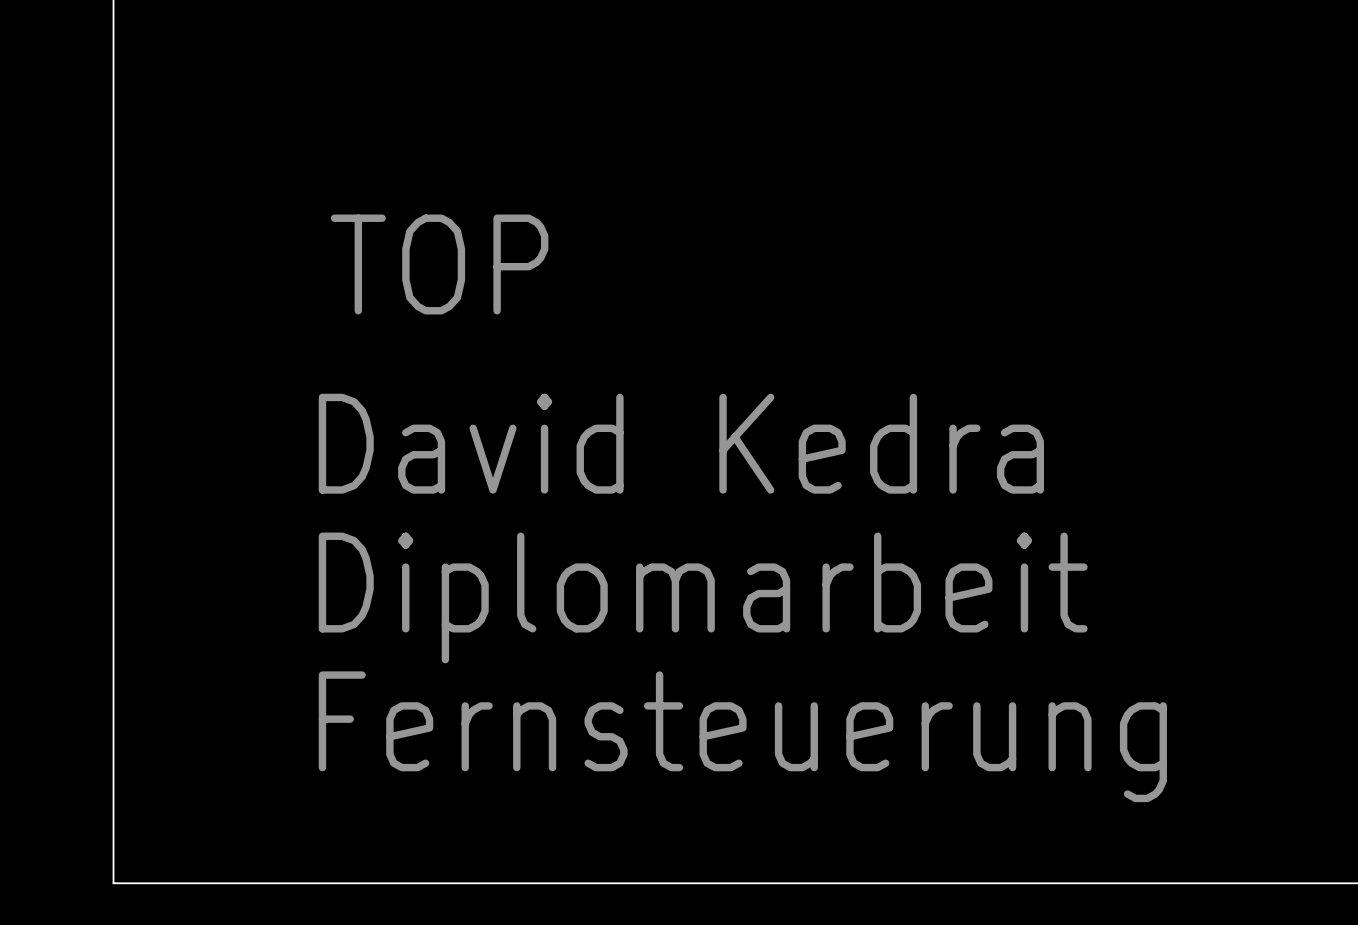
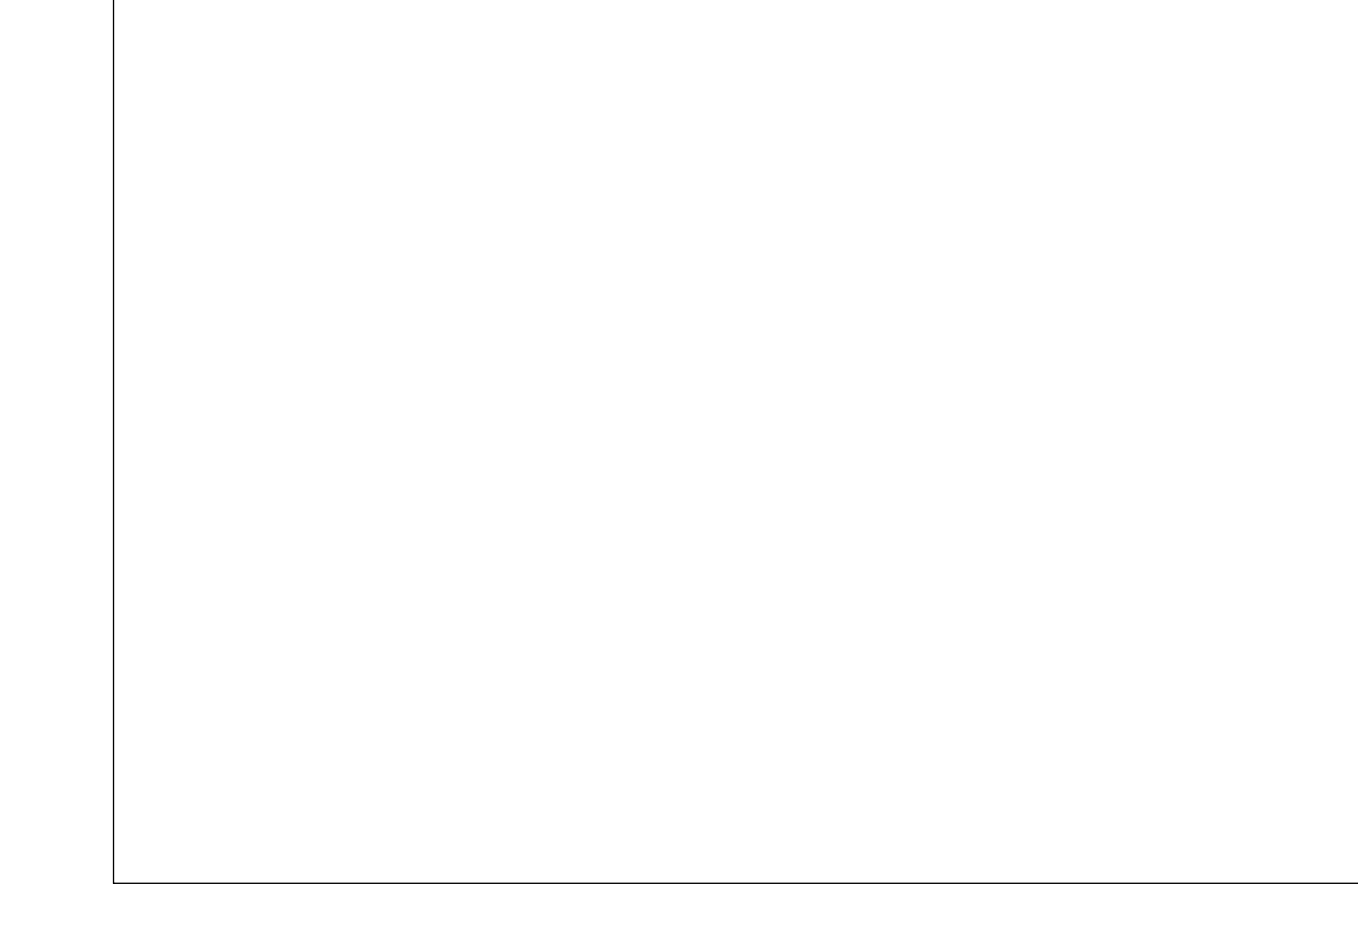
text: TOP (439, 264) -> none
text: David Kedra (681, 443) -> none
text: Diplomarbeit (703, 597) -> none
text: Fernsteuerung (742, 736) -> none

